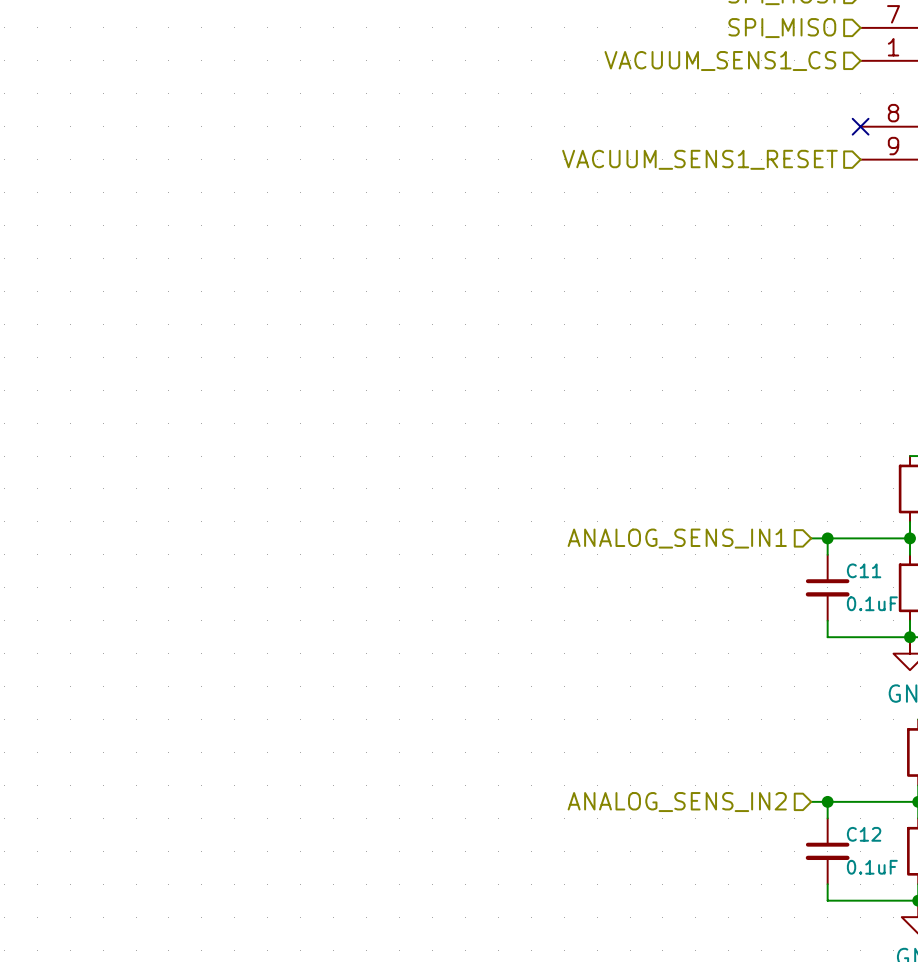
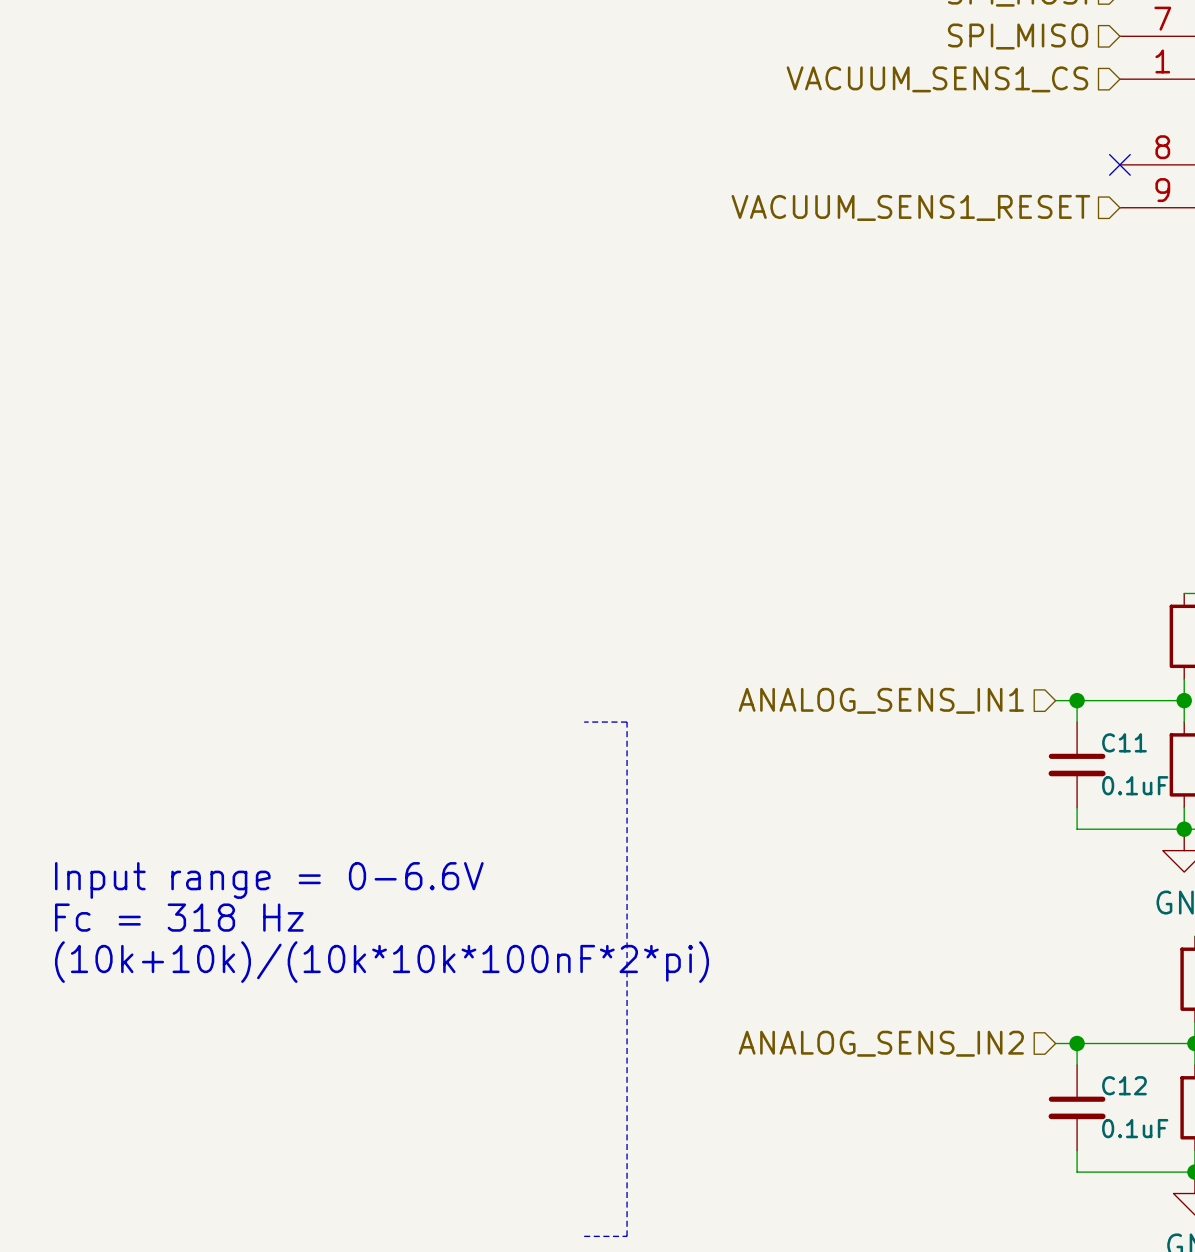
line: none -> (584, 722) (627, 722) (627, 1236) (584, 1236)
text: none -> Input range = 0-6.6V (269, 880)
text: none -> Fc = 318 Hz (179, 917)
text: none -> (10k+10k)/(10k*10k*100nF*2*pi) (381, 962)

